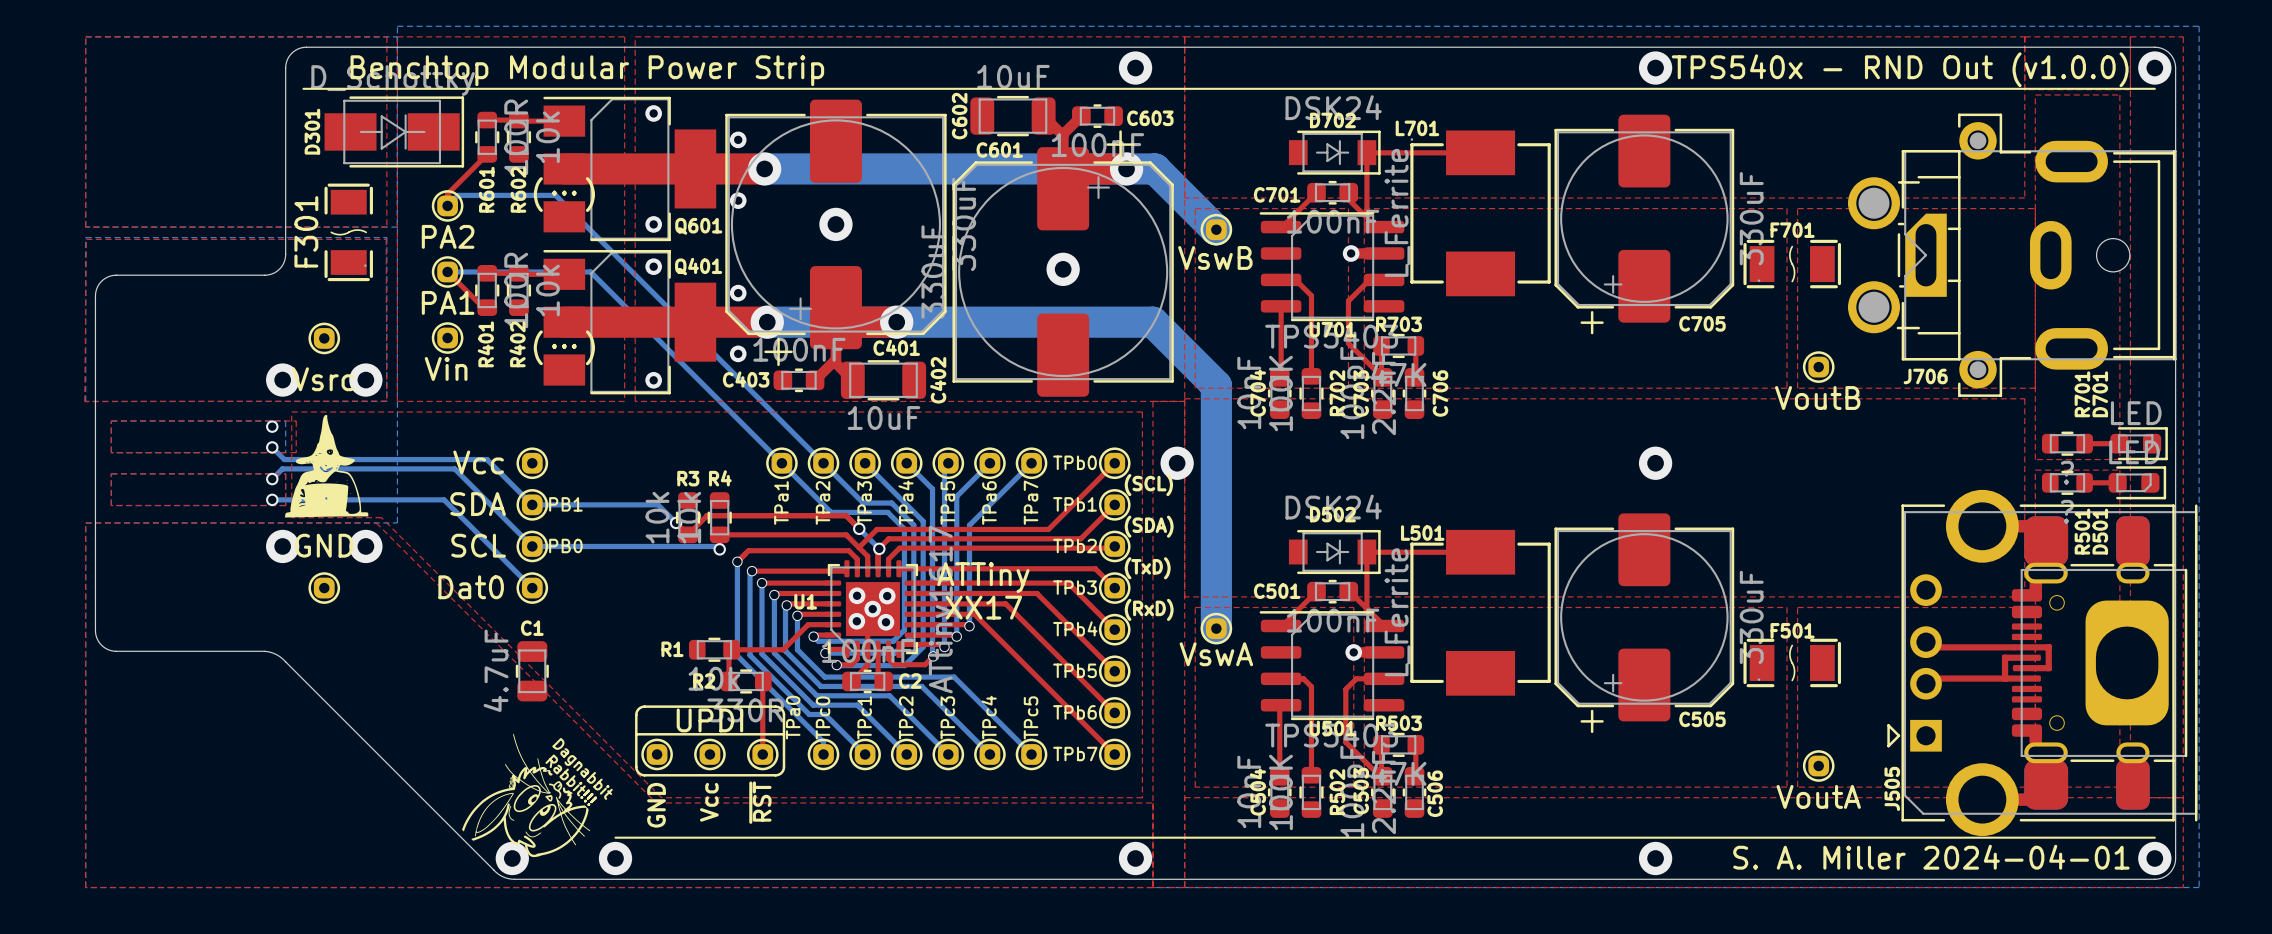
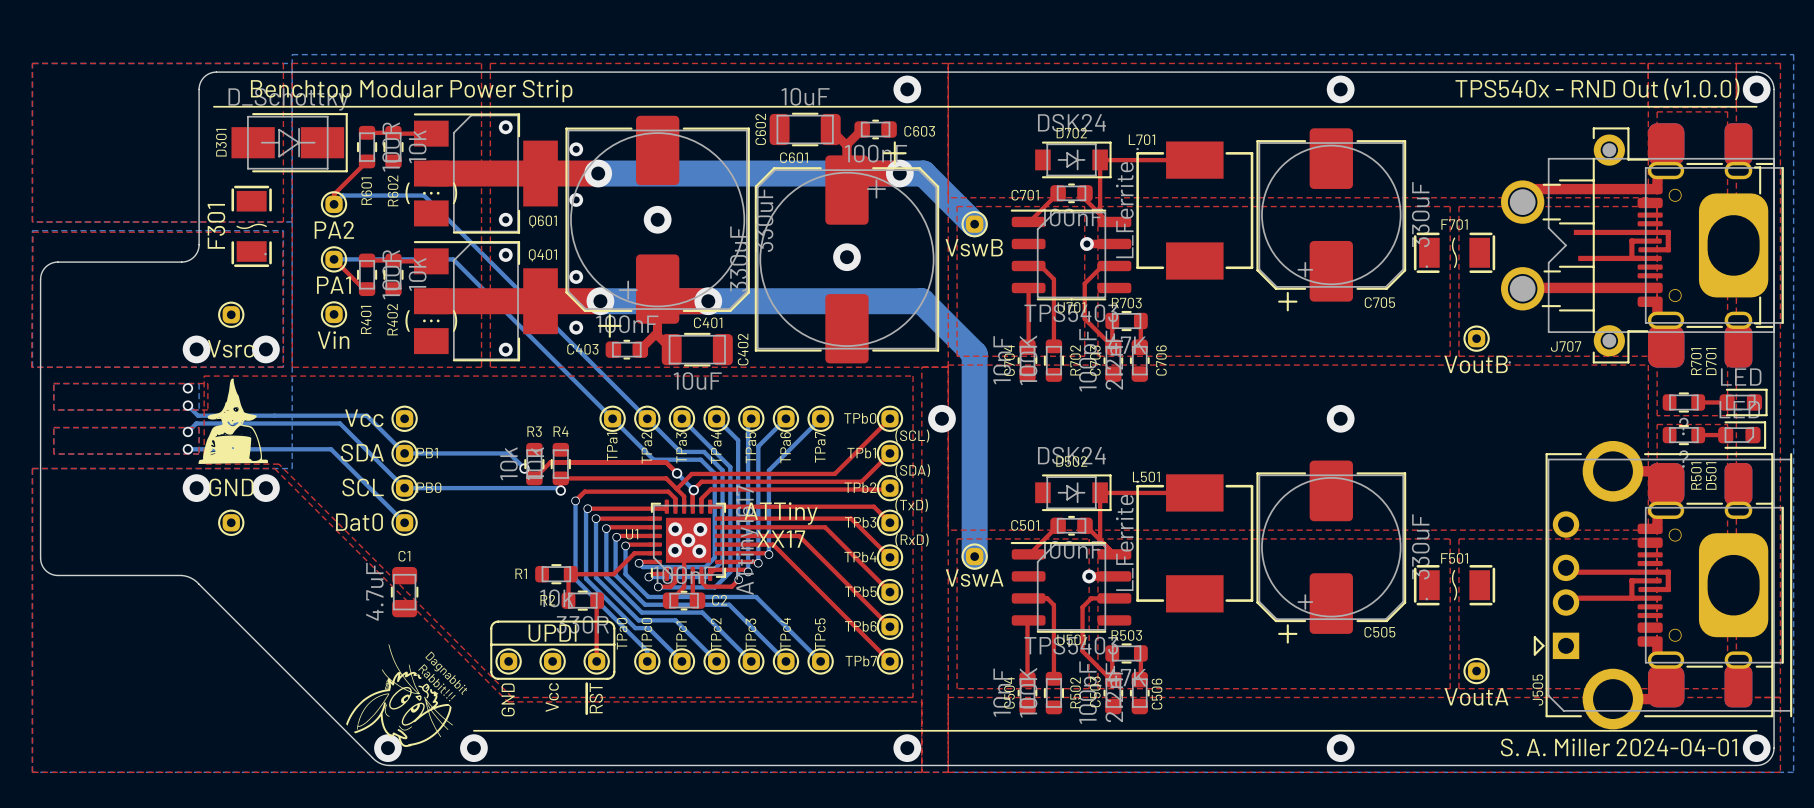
J706: (2012, 255) -> none
J707: none -> (1642, 245)

